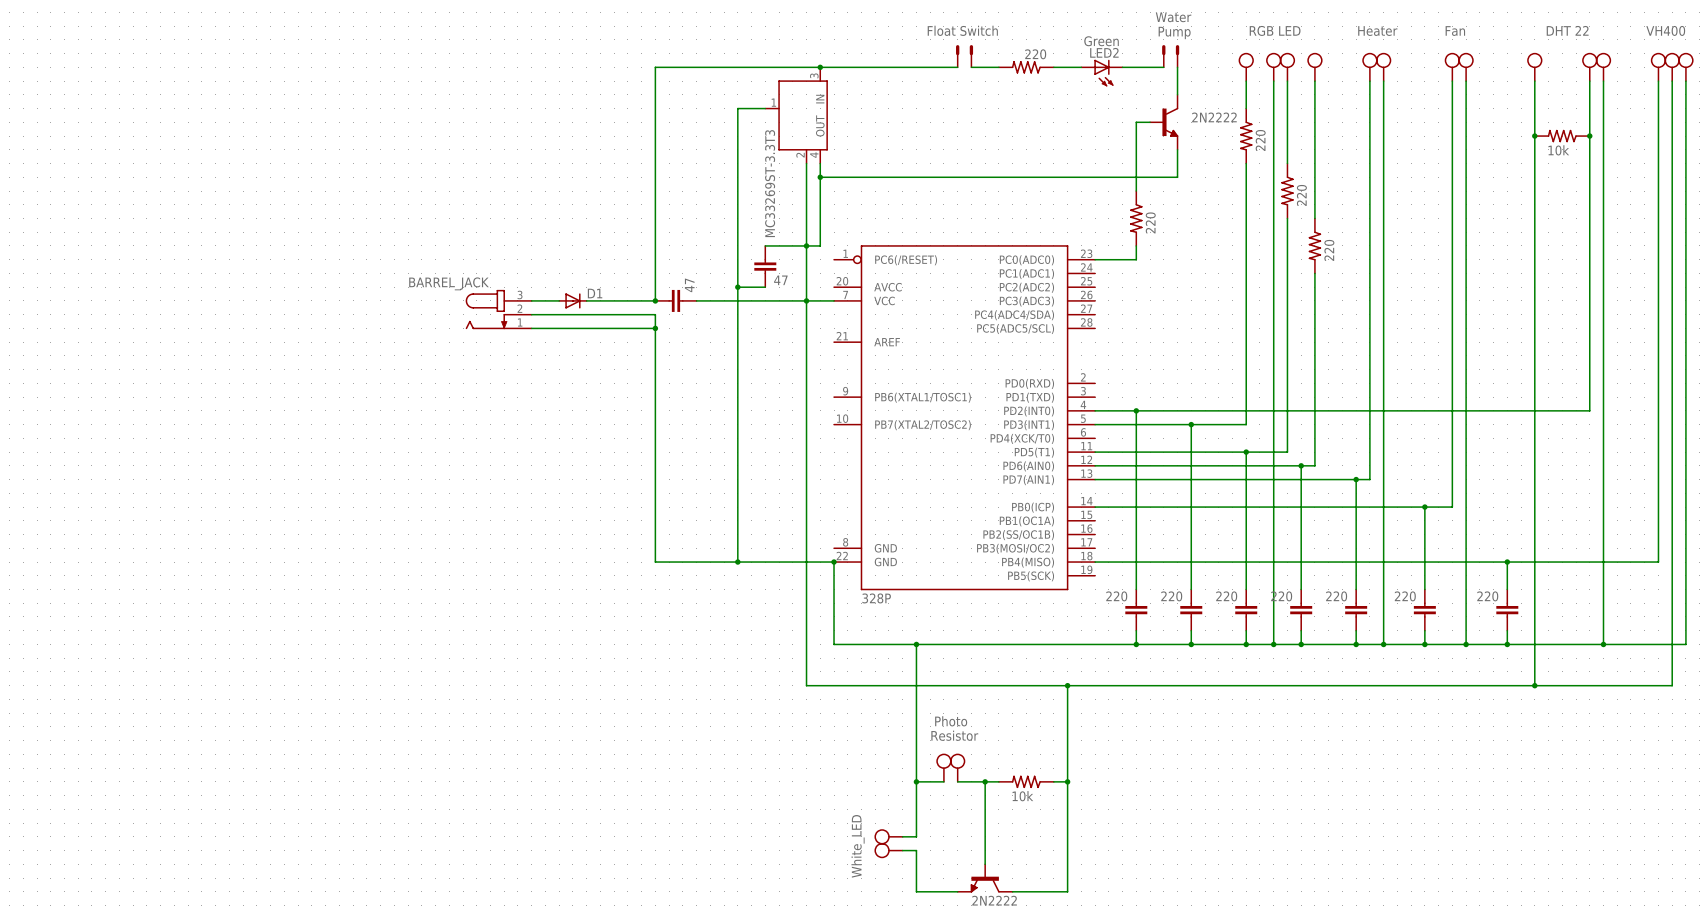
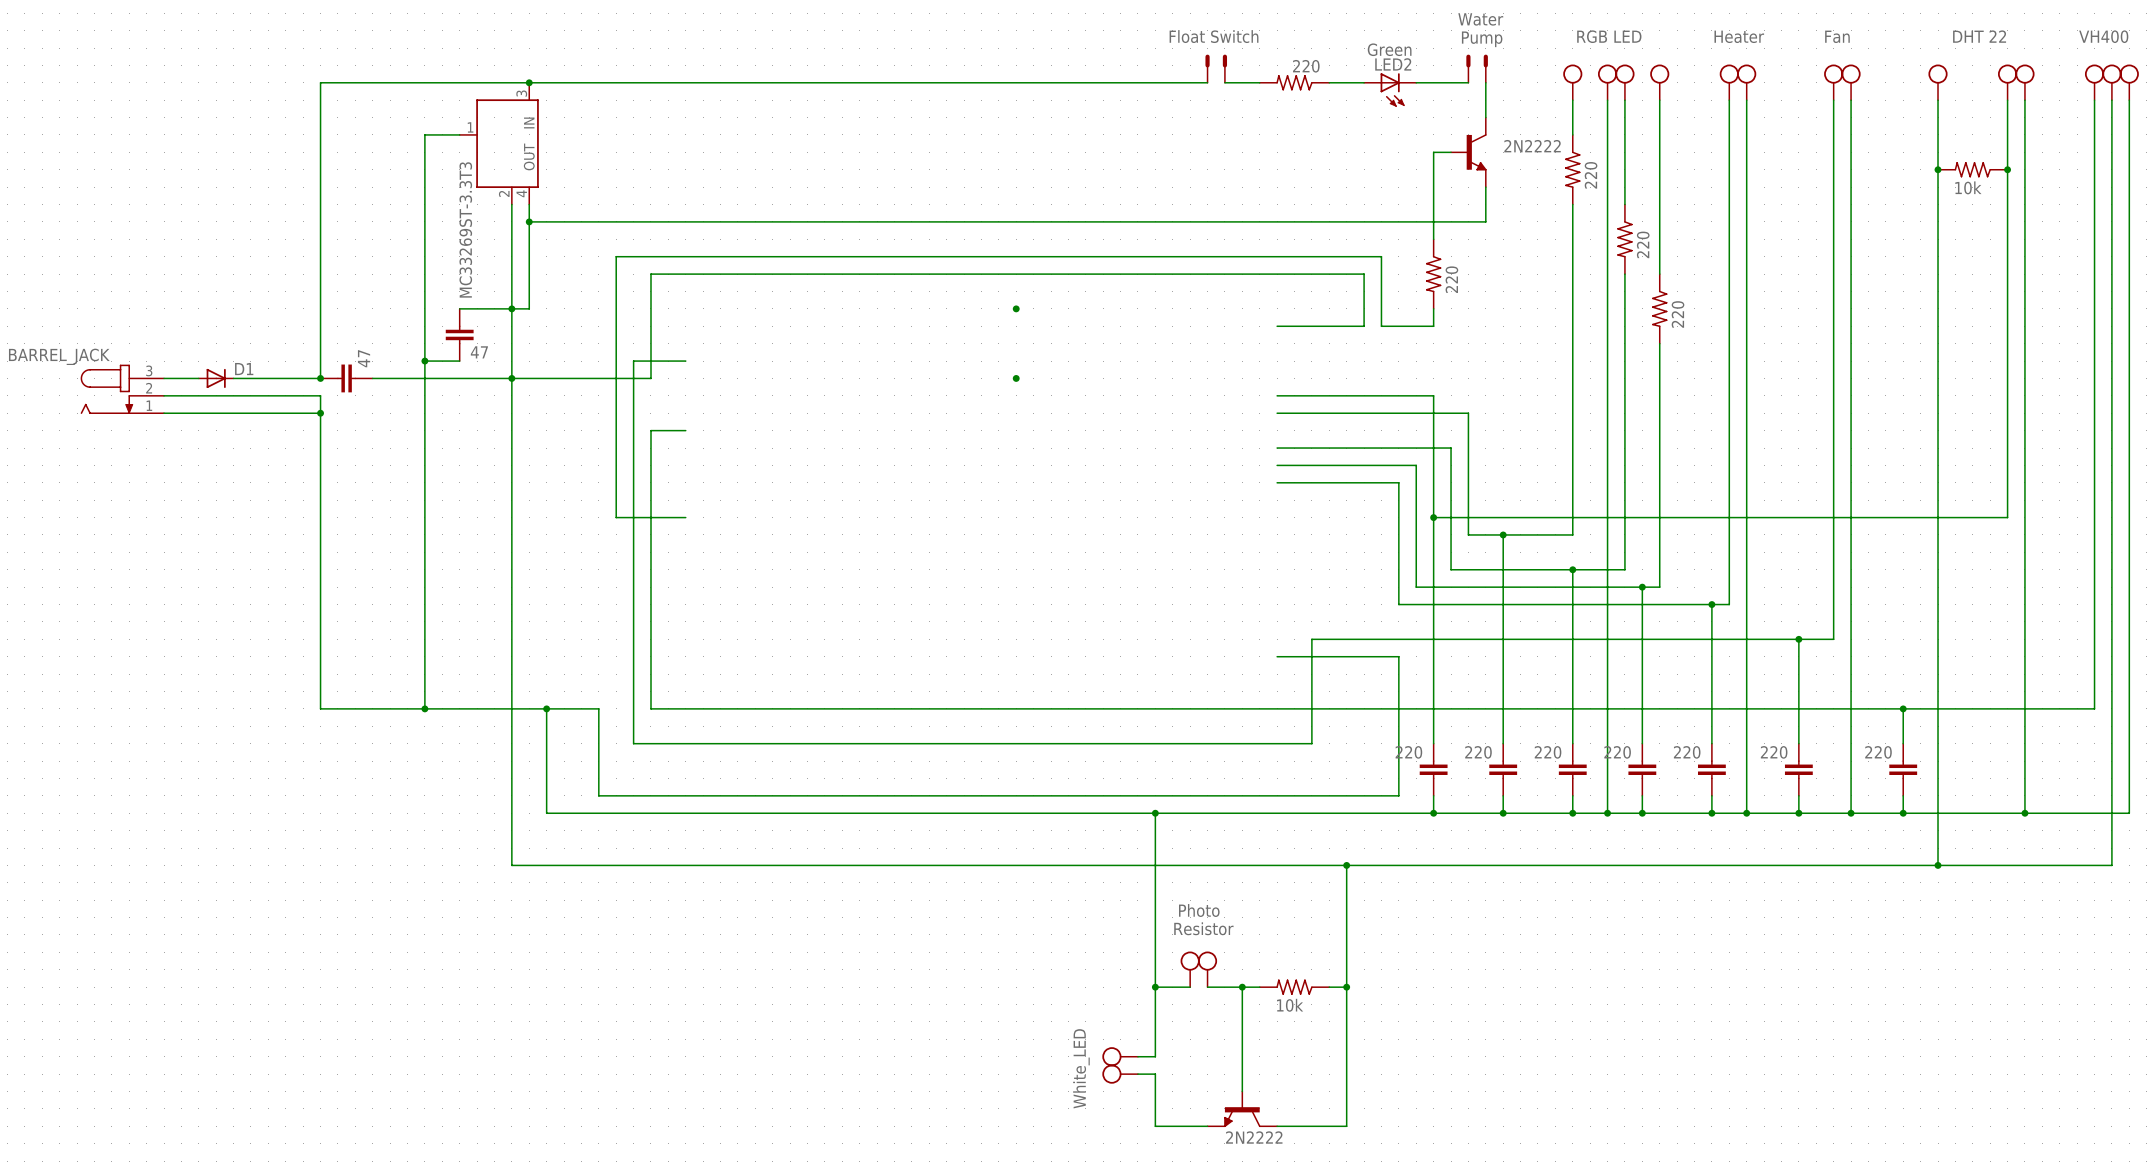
junction: none -> (529, 82)
wire: (655, 67) (655, 300) (586, 300) -> (824, 82) (320, 82) (320, 378) (233, 378)
junction: (820, 67) -> none
wire: none -> (459, 134) (424, 134) (424, 708)
wire: (765, 108) (737, 108) (737, 562) -> none
part: none -> MC33269ST-3.3T3 (499, 143)
part: MC33269ST-3.3T3 (796, 115) -> none
wire: none -> (529, 204) (529, 308) (459, 308)
wire: (806, 163) (806, 685) -> (511, 204) (511, 865) (1016, 865)
wire: (820, 163) (820, 245) (765, 245) -> none
wire: none -> (529, 221) (1033, 221)
junction: none -> (529, 221)
junction: (820, 177) -> none
junction: none -> (511, 308)
wire: none -> (1277, 326) (1364, 326) (1364, 274) (650, 274) (650, 378) (372, 378)
wire: none -> (1381, 326) (1381, 256) (616, 256) (616, 517) (685, 517)
part: none -> 47 (459, 334)
part: 47 (765, 266) -> none
wire: none -> (424, 361) (459, 361)
junction: none -> (424, 361)
wire: none -> (685, 361) (633, 361) (633, 743) (1311, 743) (1311, 639) (1381, 639)
wire: (737, 287) (765, 287) -> none
junction: (737, 287) -> none
wire: none -> (164, 378) (198, 378)
junction: none -> (320, 378)
part: none -> 47 (346, 378)
junction: none -> (511, 378)
wire: (531, 300) (559, 300) -> none
D1 position: (572, 300) -> (216, 378)
junction: (655, 300) -> none
part: 47 (675, 300) -> none
wire: (696, 300) (834, 300) -> none
BARREL_JACK: none -> (122, 389)
BARREL_JACK: (498, 309) -> none
wire: none -> (164, 395) (320, 395) (320, 708) (598, 708) (598, 795) (1398, 795) (1398, 656) (1277, 656)
wire: (531, 314) (655, 314) (655, 562) -> (685, 430) (650, 430) (650, 708) (824, 708)
wire: none -> (164, 413) (320, 413)
junction: none -> (320, 413)
wire: (531, 328) (655, 328) -> none
junction: (655, 328) -> none
wire: (1095, 410) (1136, 410) -> (1277, 395) (1433, 395) (1433, 517)
part: 328P (964, 417) -> none
wire: (1095, 424) (1163, 424) -> (1277, 413) (1468, 413) (1468, 534)
wire: (1095, 452) (1150, 452) -> (1277, 448) (1451, 448) (1451, 569)
wire: (1095, 465) (1122, 465) -> (1277, 465) (1416, 465) (1416, 587)
wire: (1095, 479) (1108, 479) -> (1277, 482) (1398, 482) (1398, 604)
junction: none -> (424, 708)
wire: none -> (546, 708) (546, 813) (1051, 813)
junction: none -> (546, 708)
junction: (737, 562) -> none
wire: (834, 562) (834, 644) -> (1051, 708) (1381, 708)
junction: (834, 562) -> none

